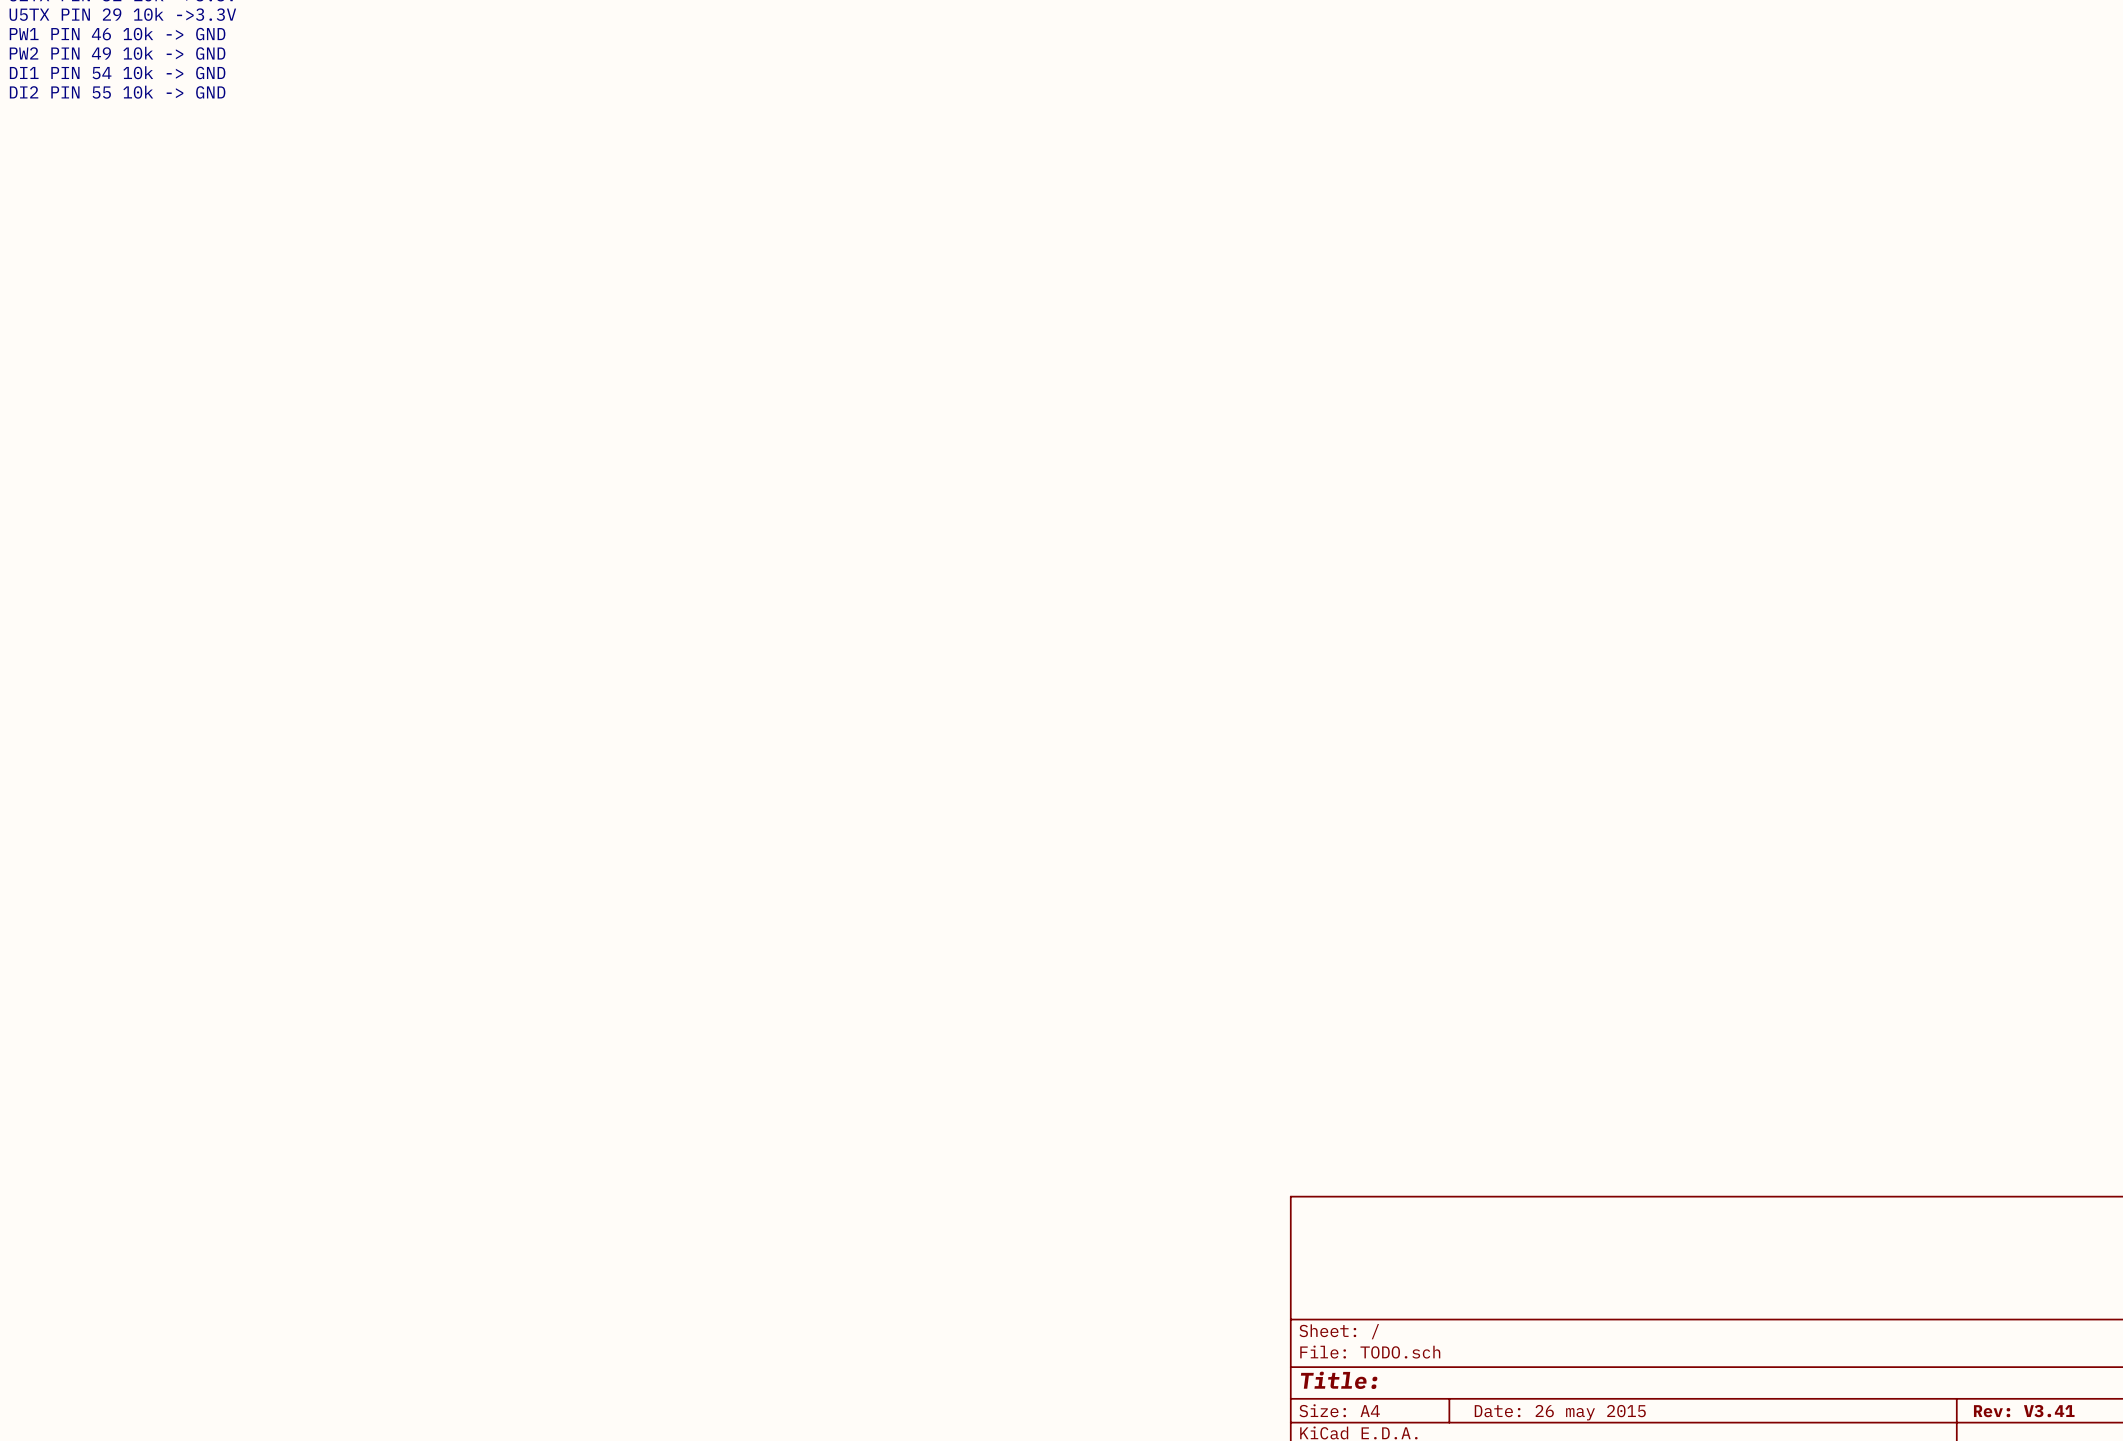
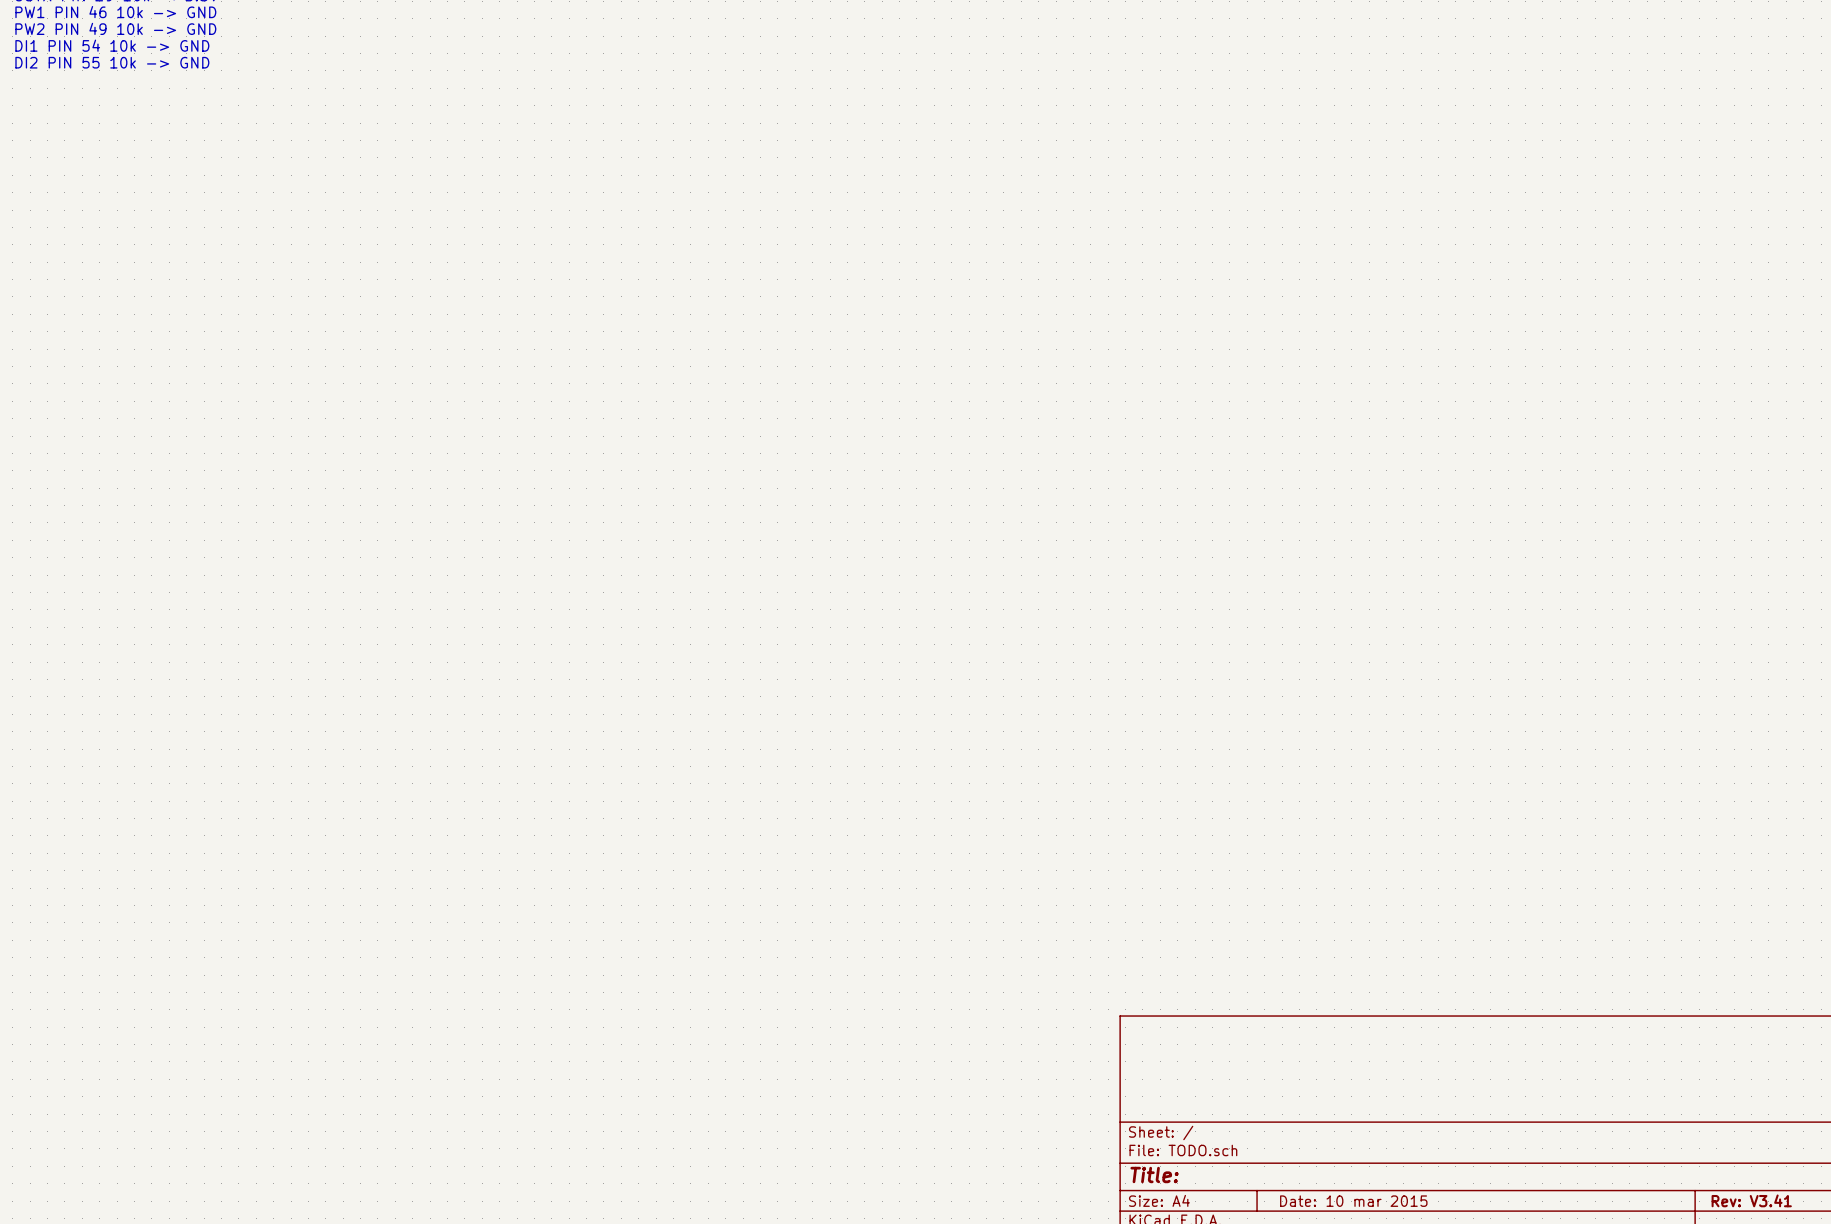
title block: Date: 26 may 2015 (1560, 1412) -> Date: 10 mar 2015 (1353, 1201)

